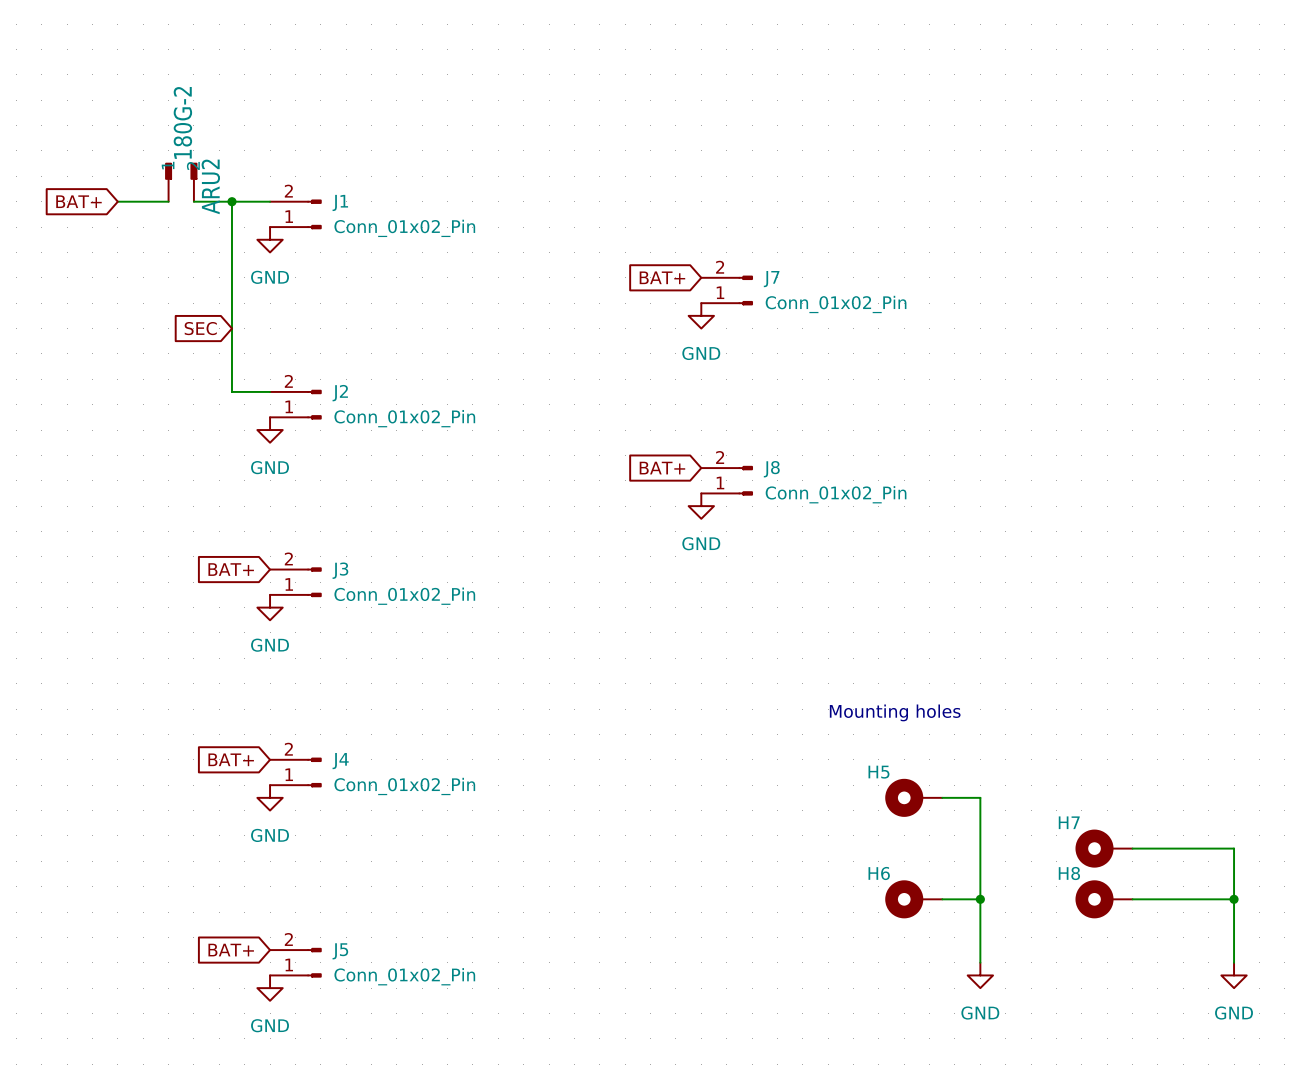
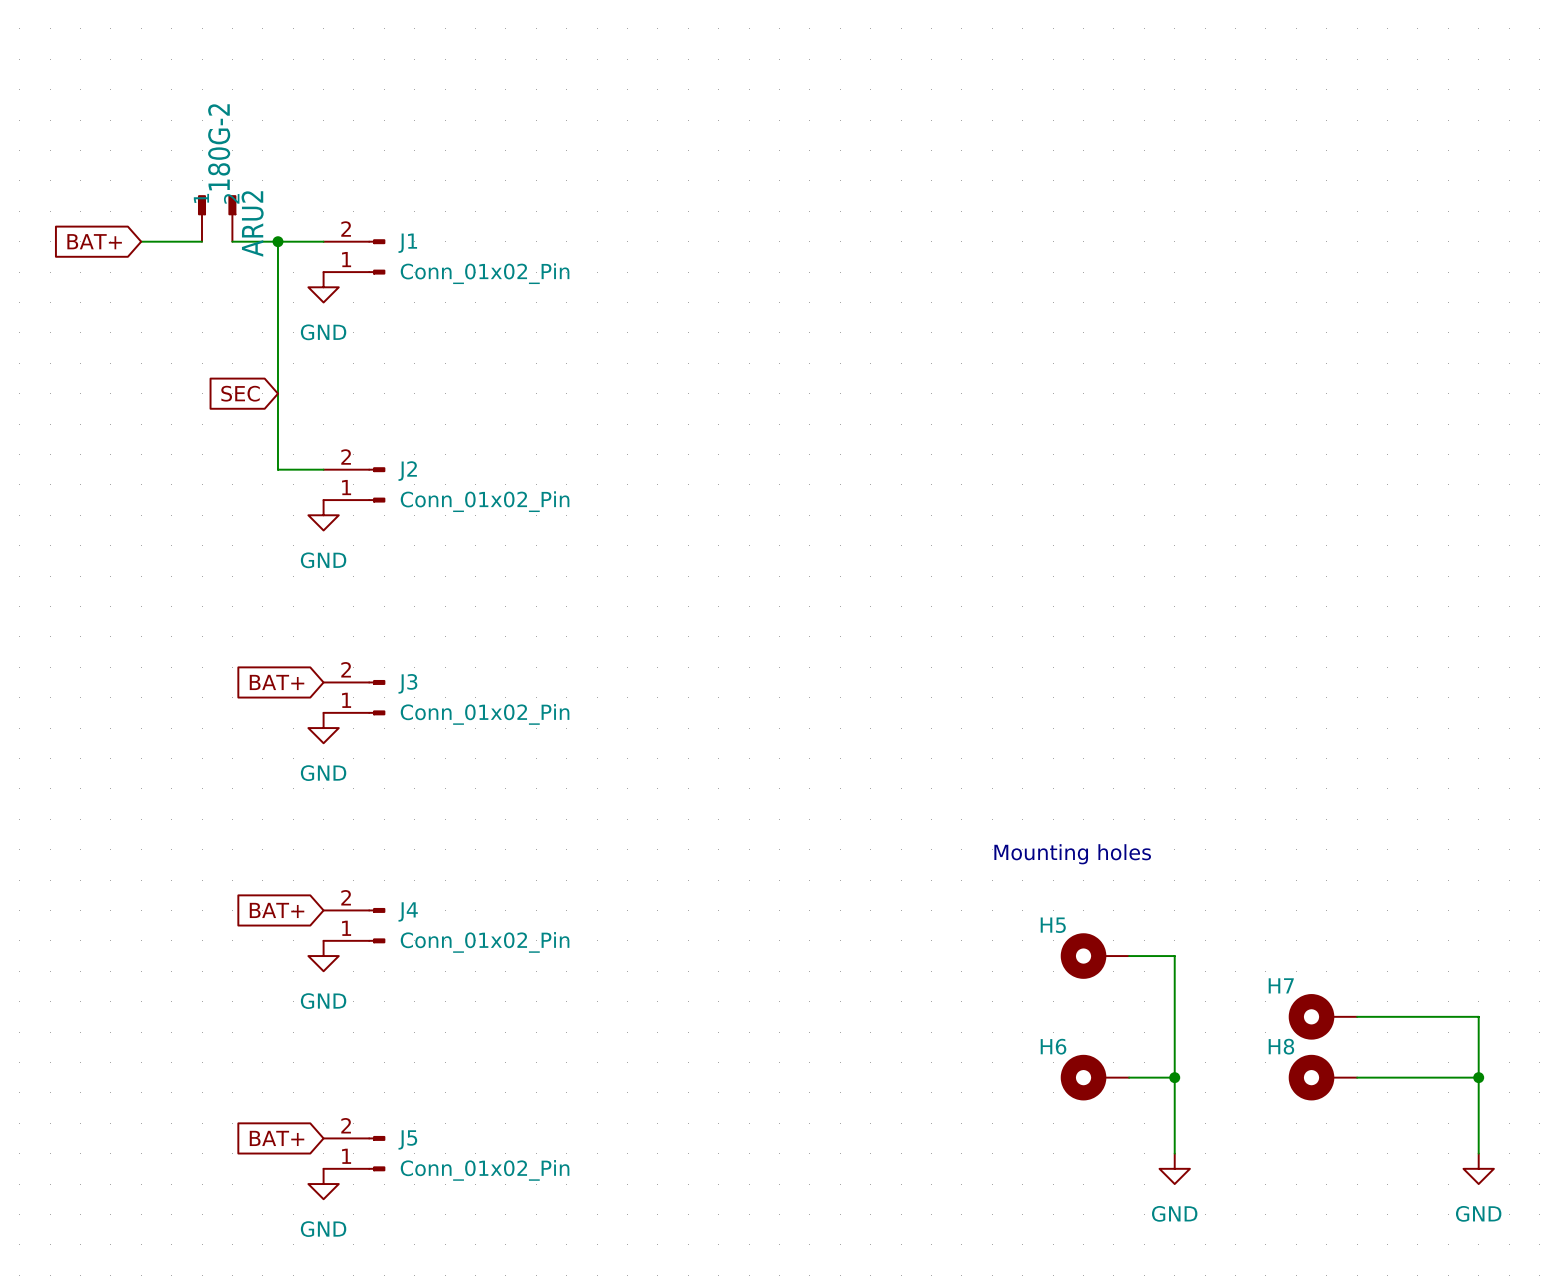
global label: BAT+ (662, 277) -> none
J7: Conn_01x02_Pin (727, 290) -> none
power symbol: GND (701, 315) -> none
global label: BAT+ (662, 468) -> none
J8: Conn_01x02_Pin (727, 480) -> none
power symbol: GND (701, 506) -> none

